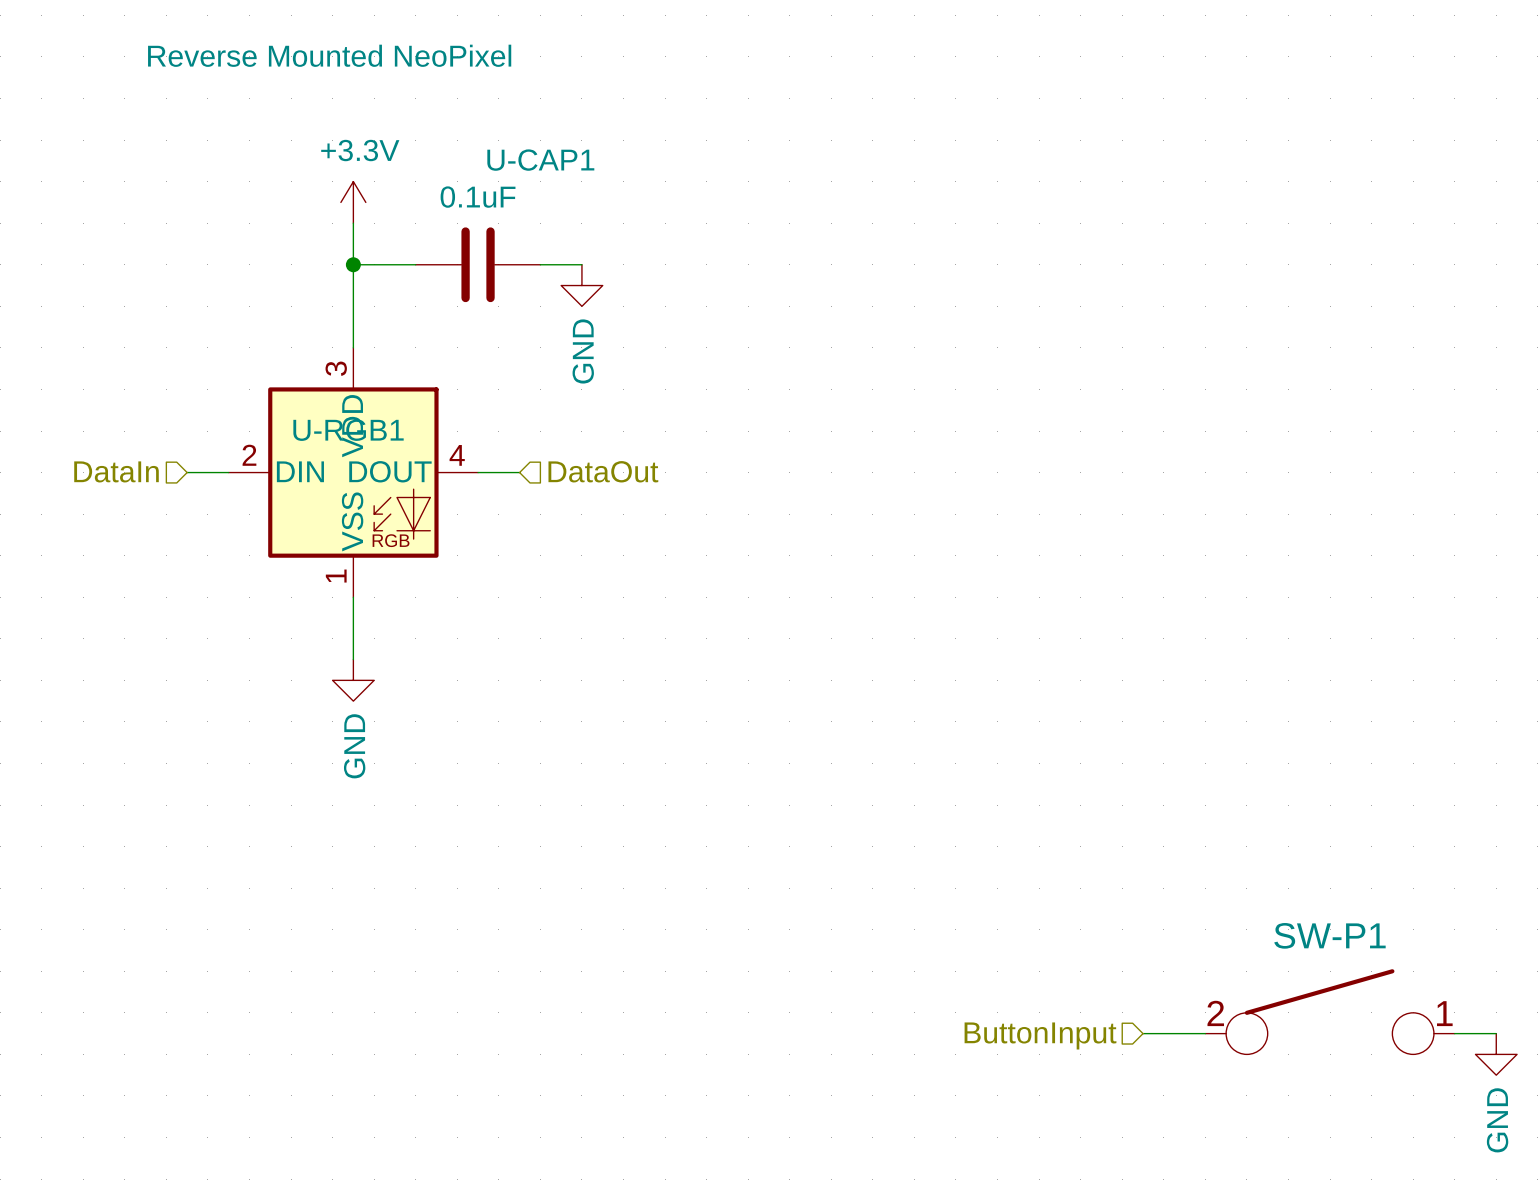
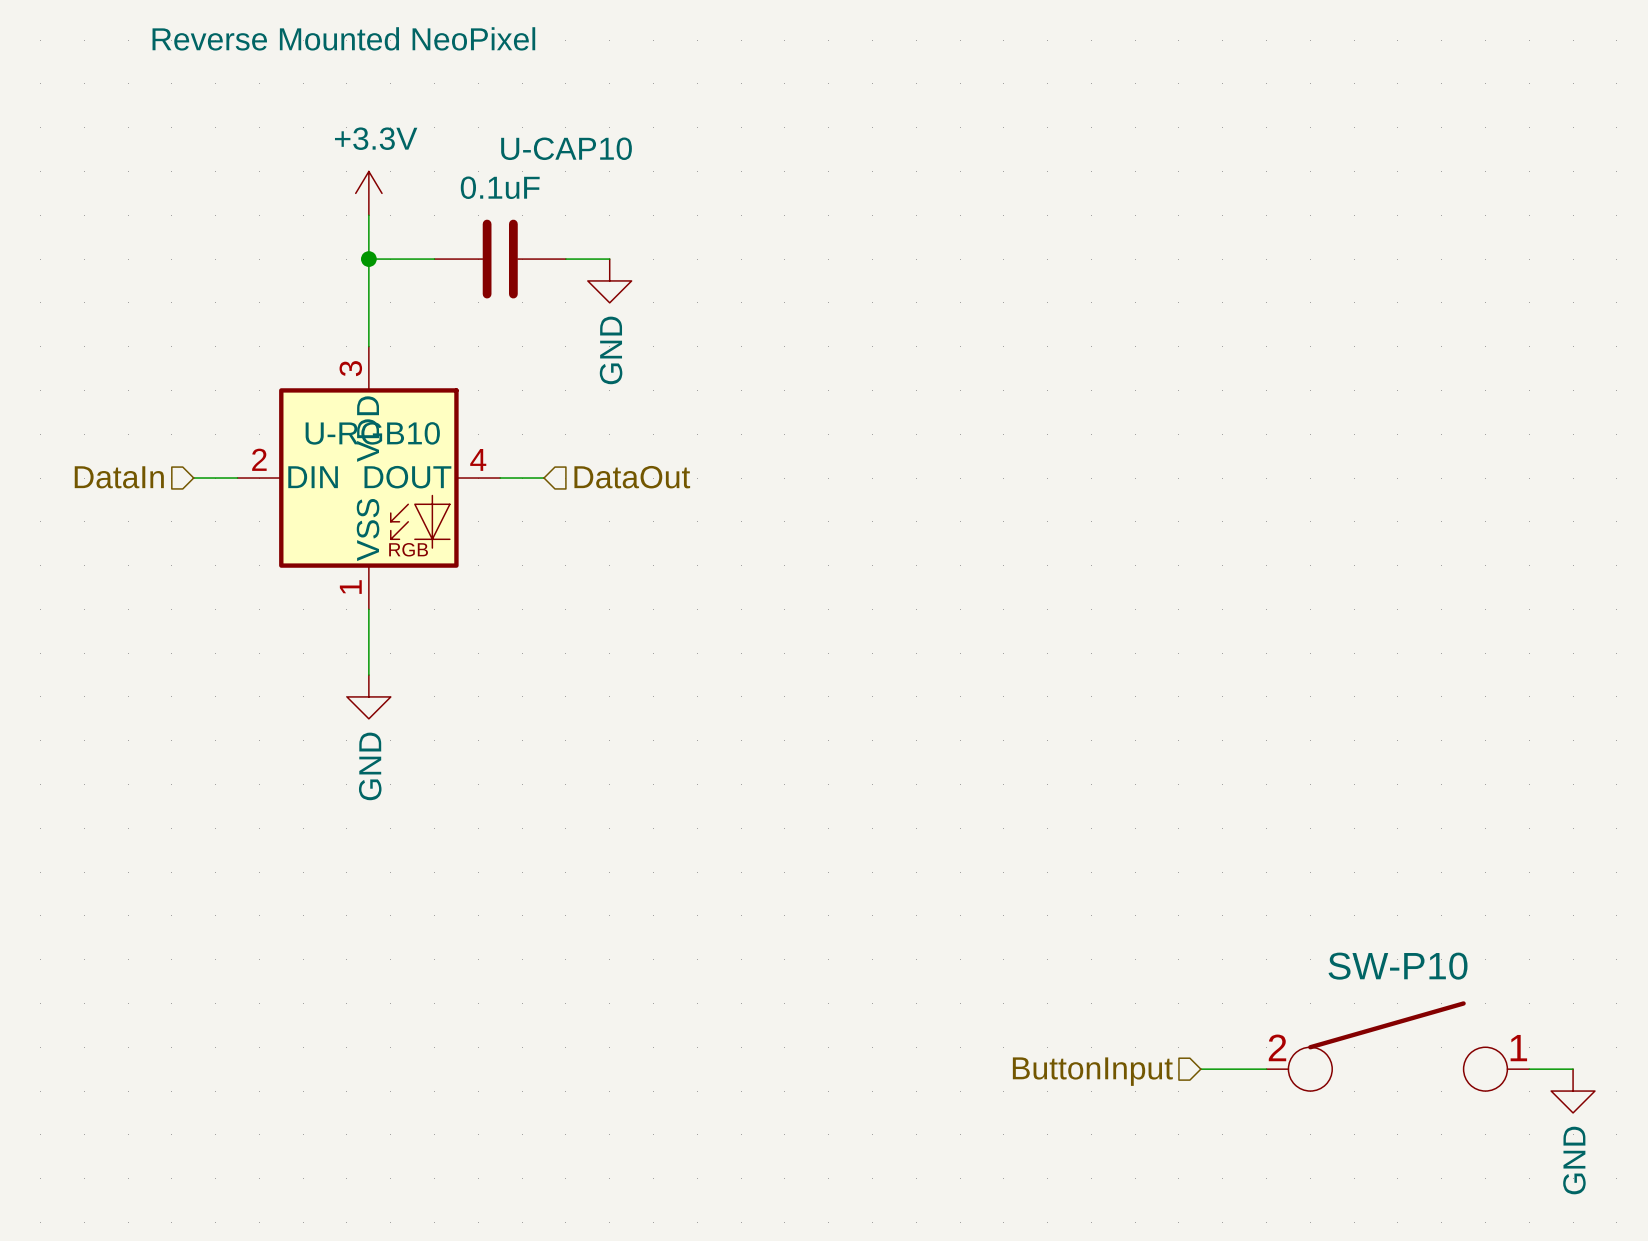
U-CAP1 name: U-CAP1 (540, 160) -> U-CAP10 (566, 148)
U-RGB1 name: U-RGB1 (348, 430) -> U-RGB10 (372, 433)
SW-P1 name: SW-P1 (1329, 935) -> SW-P10 (1398, 966)

